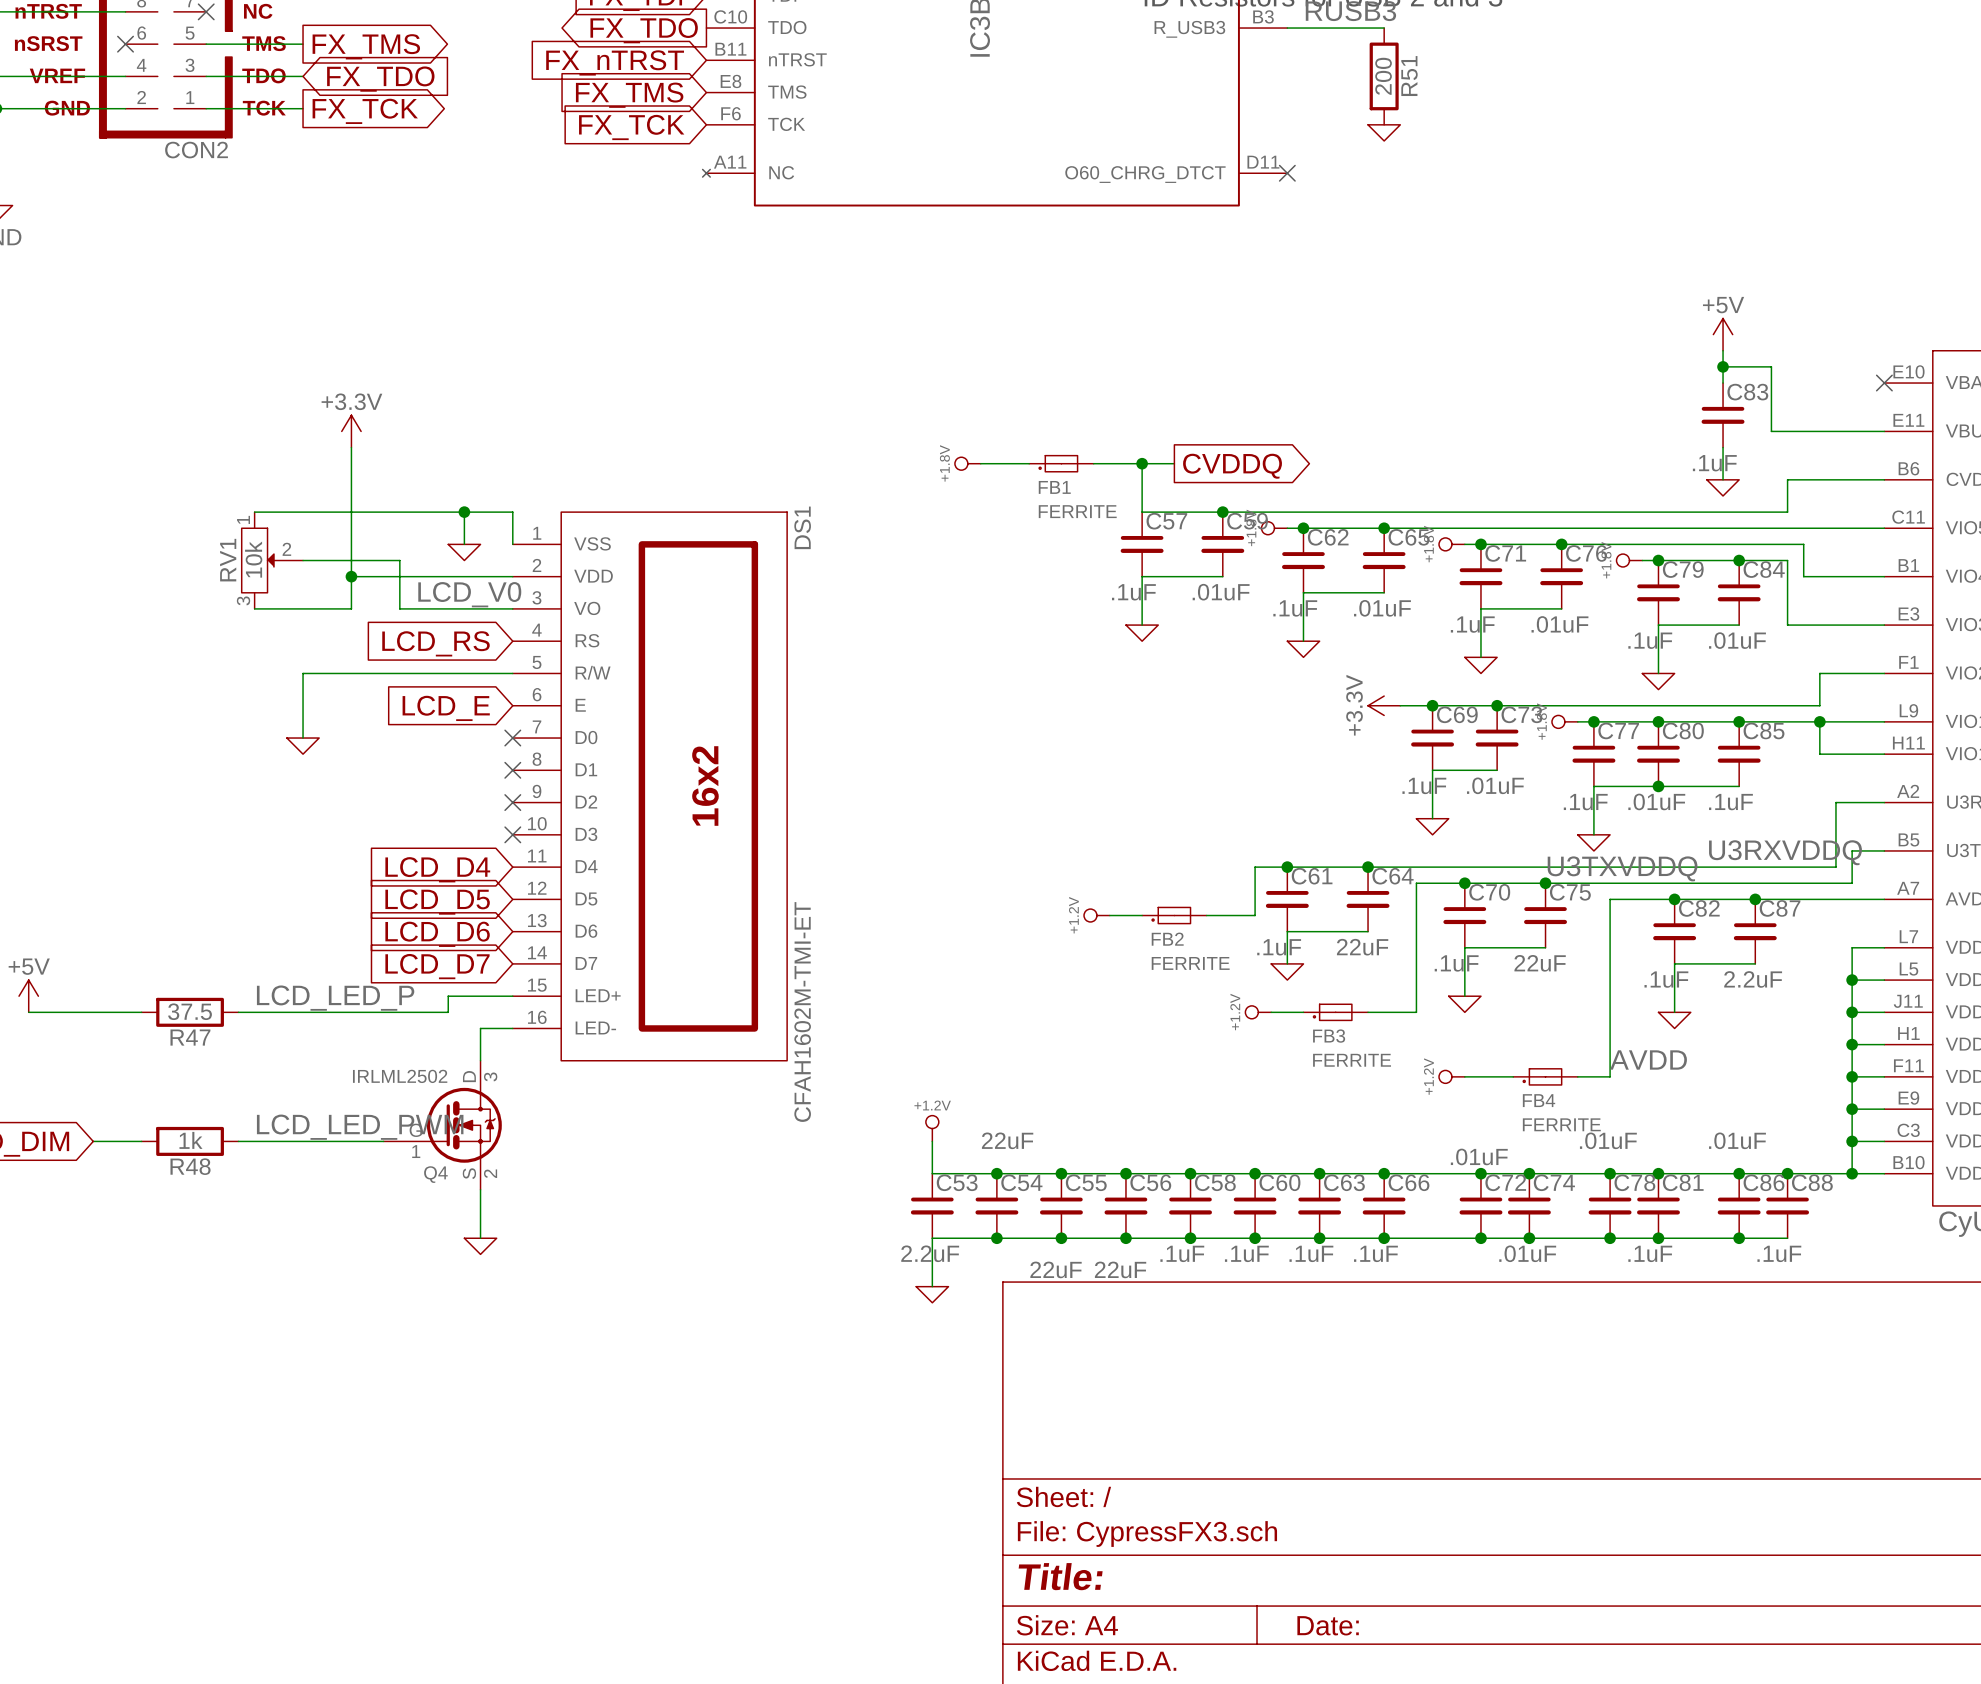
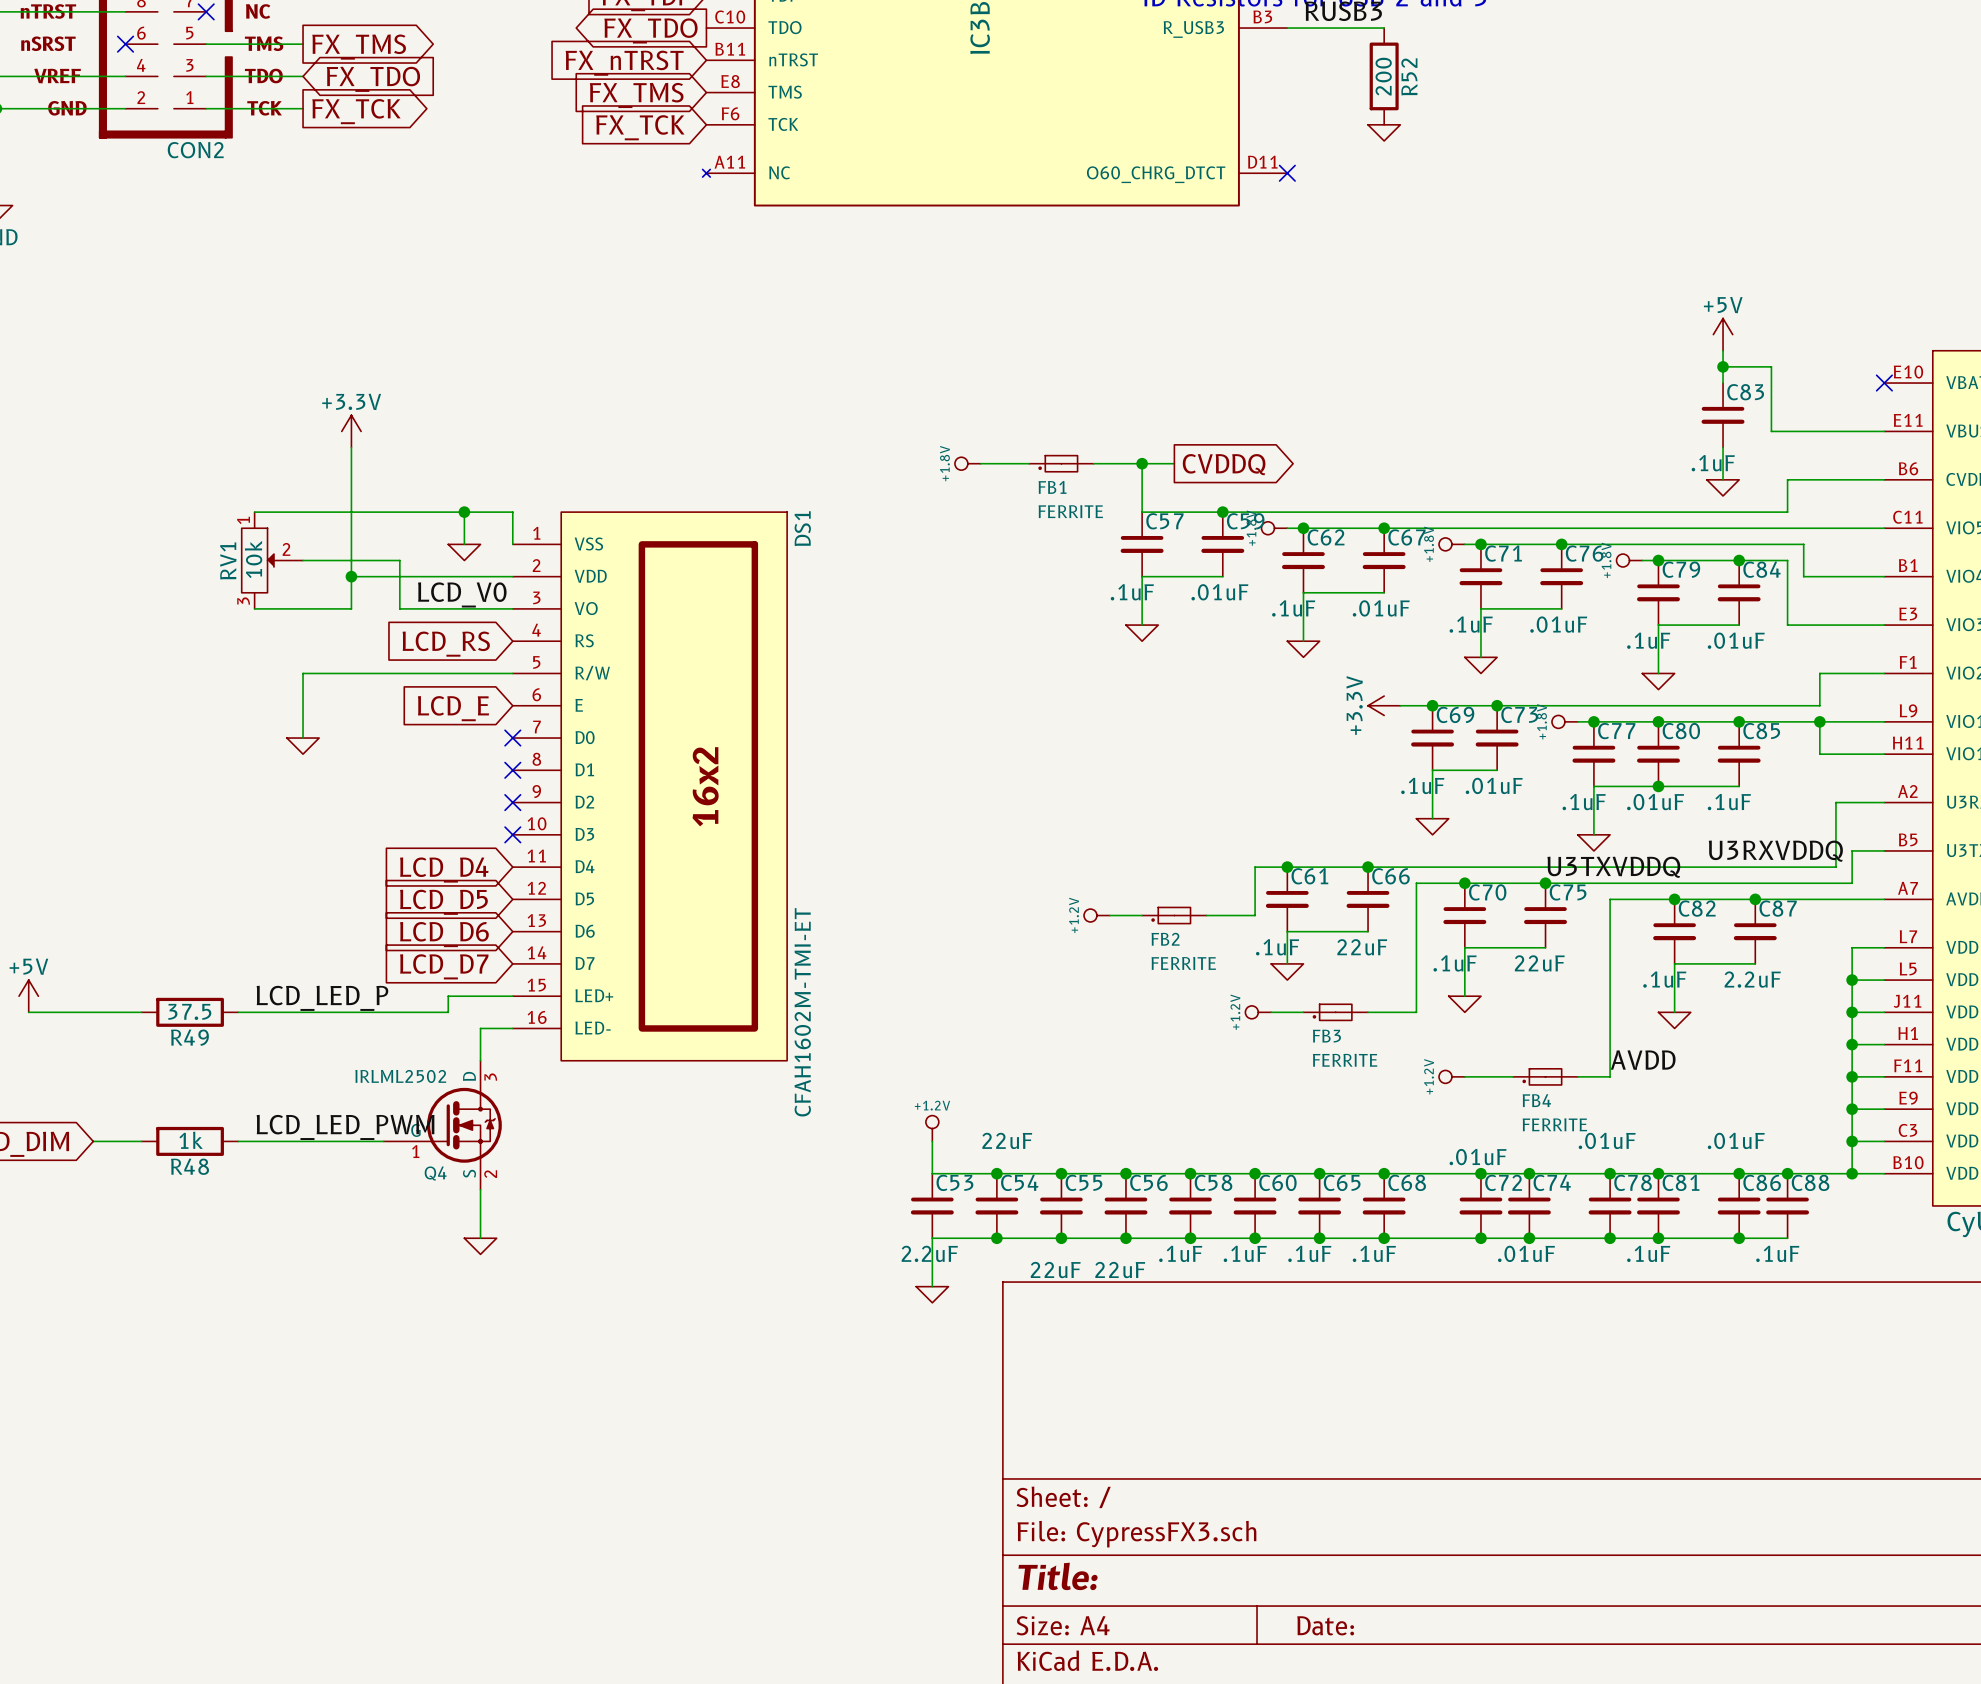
R51 name: R51 (1409, 76) -> R52 (1409, 76)
C65 name: C65 (1409, 537) -> C67 (1406, 537)
C64 name: C64 (1393, 876) -> C66 (1390, 876)
R47 name: R47 (190, 1037) -> R49 (189, 1037)
C63 name: C63 (1344, 1182) -> C65 (1342, 1182)
C66 name: C66 (1408, 1182) -> C68 (1407, 1182)

